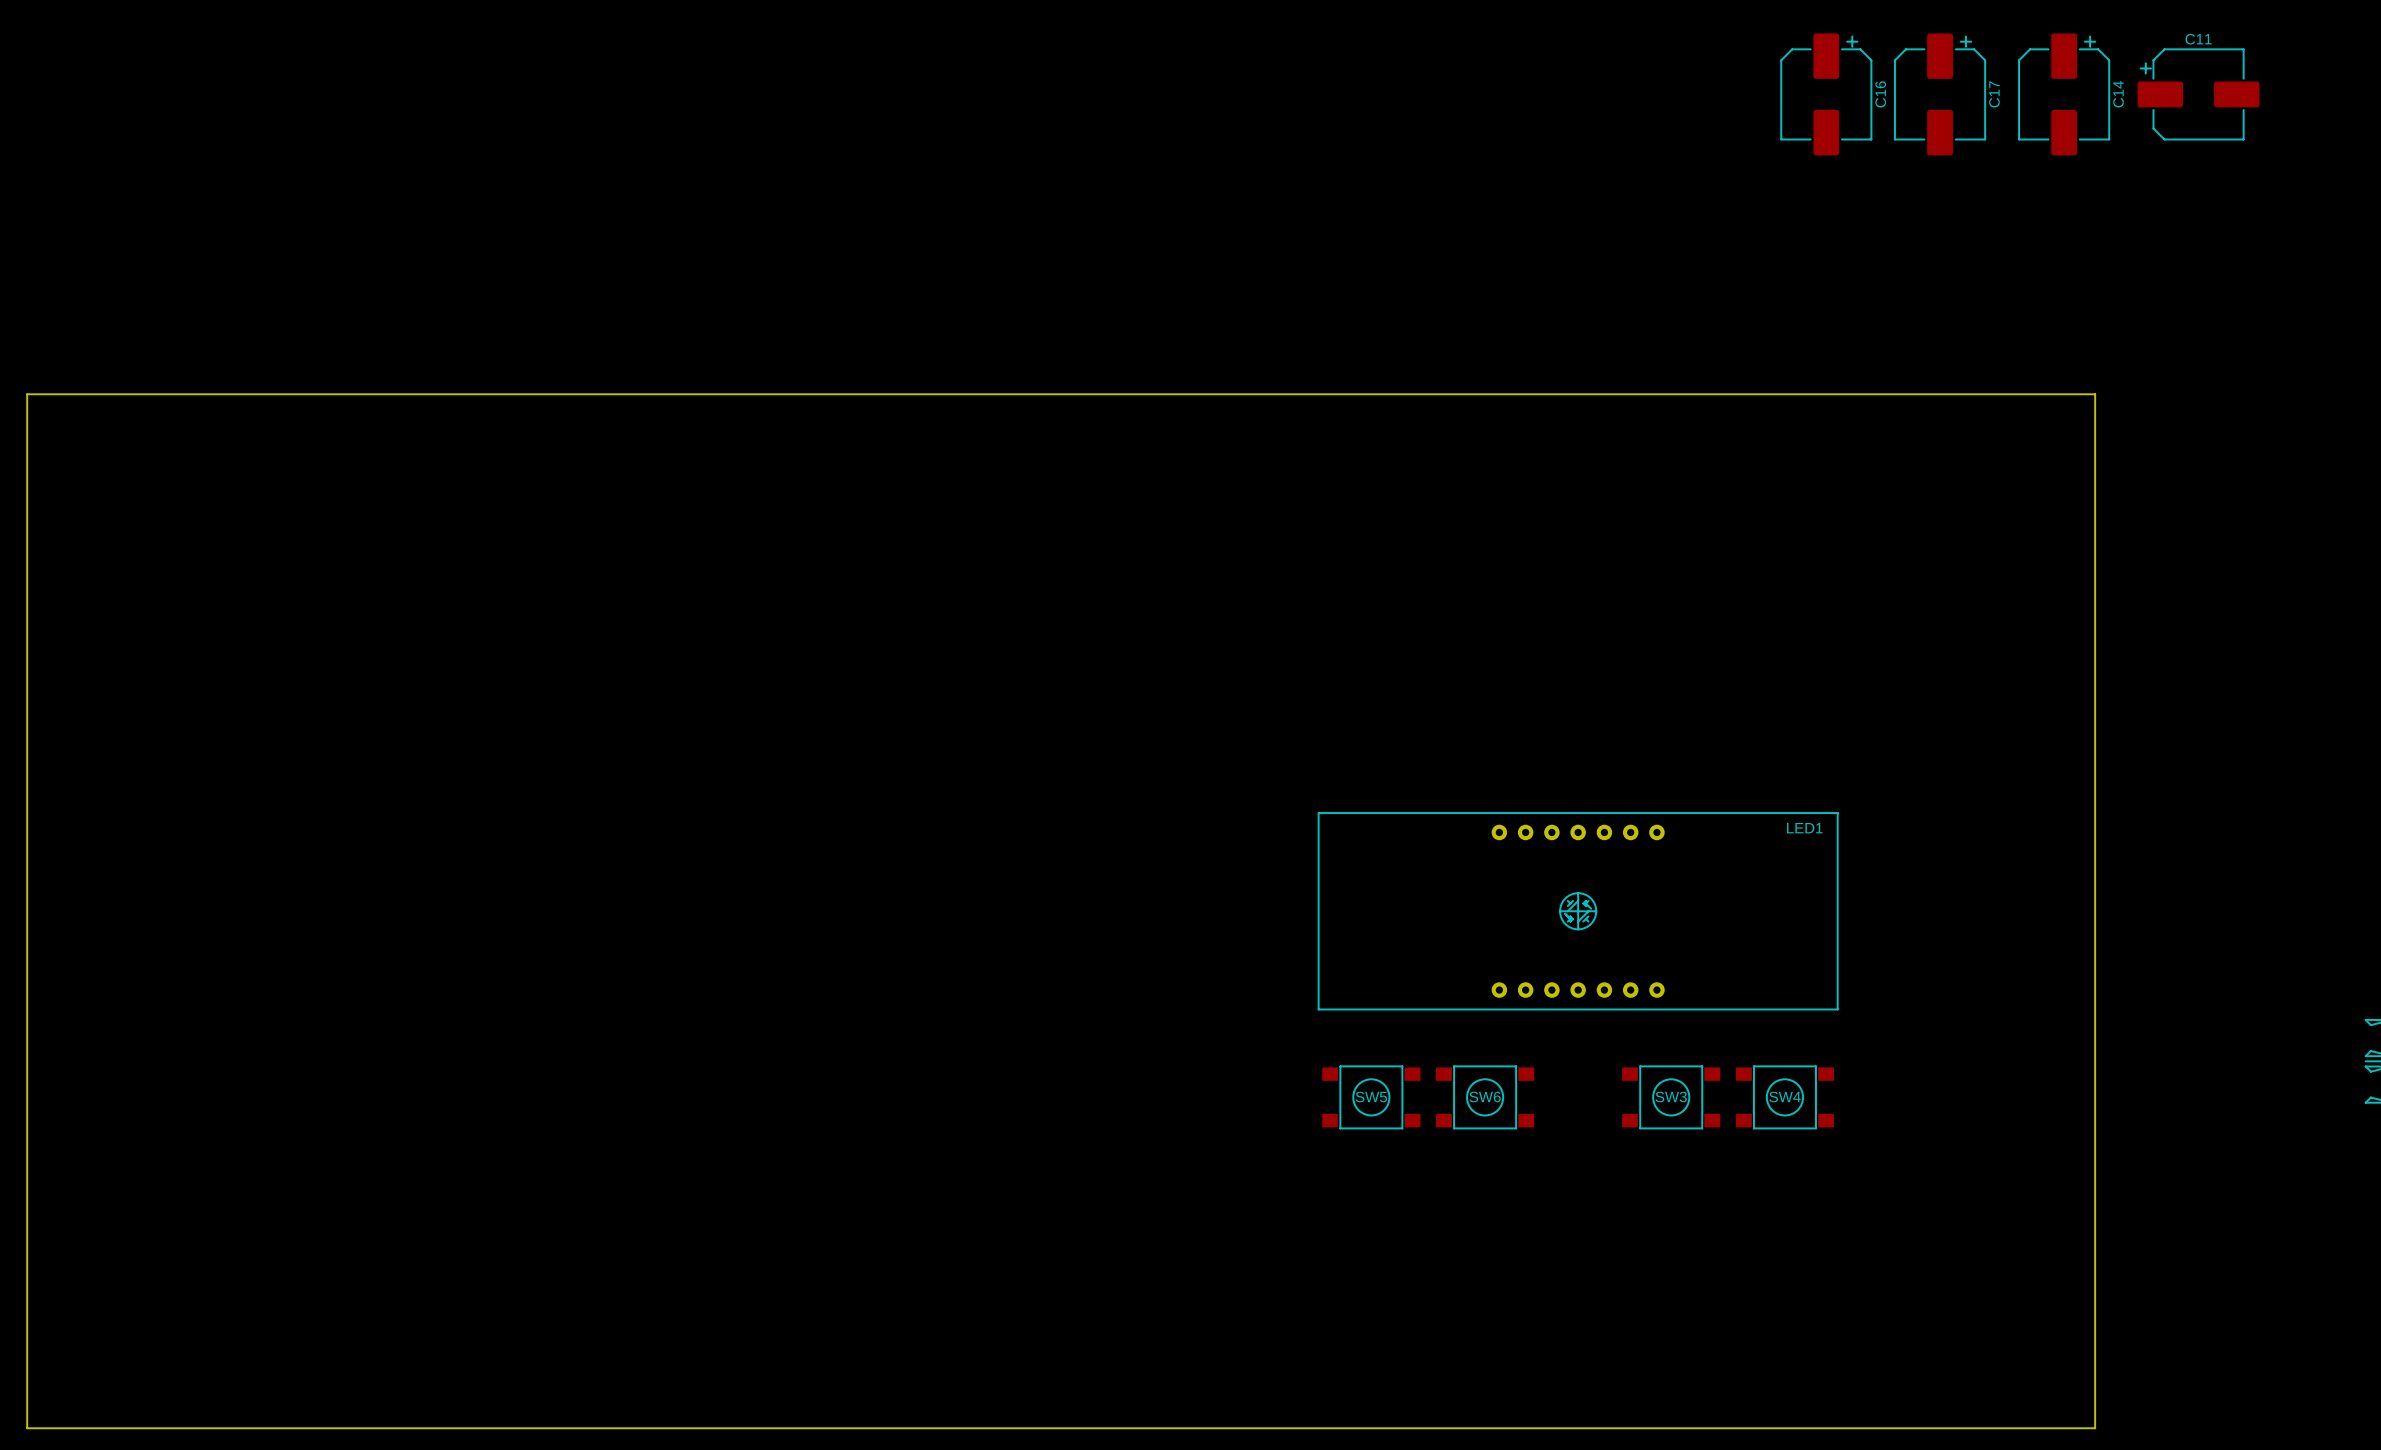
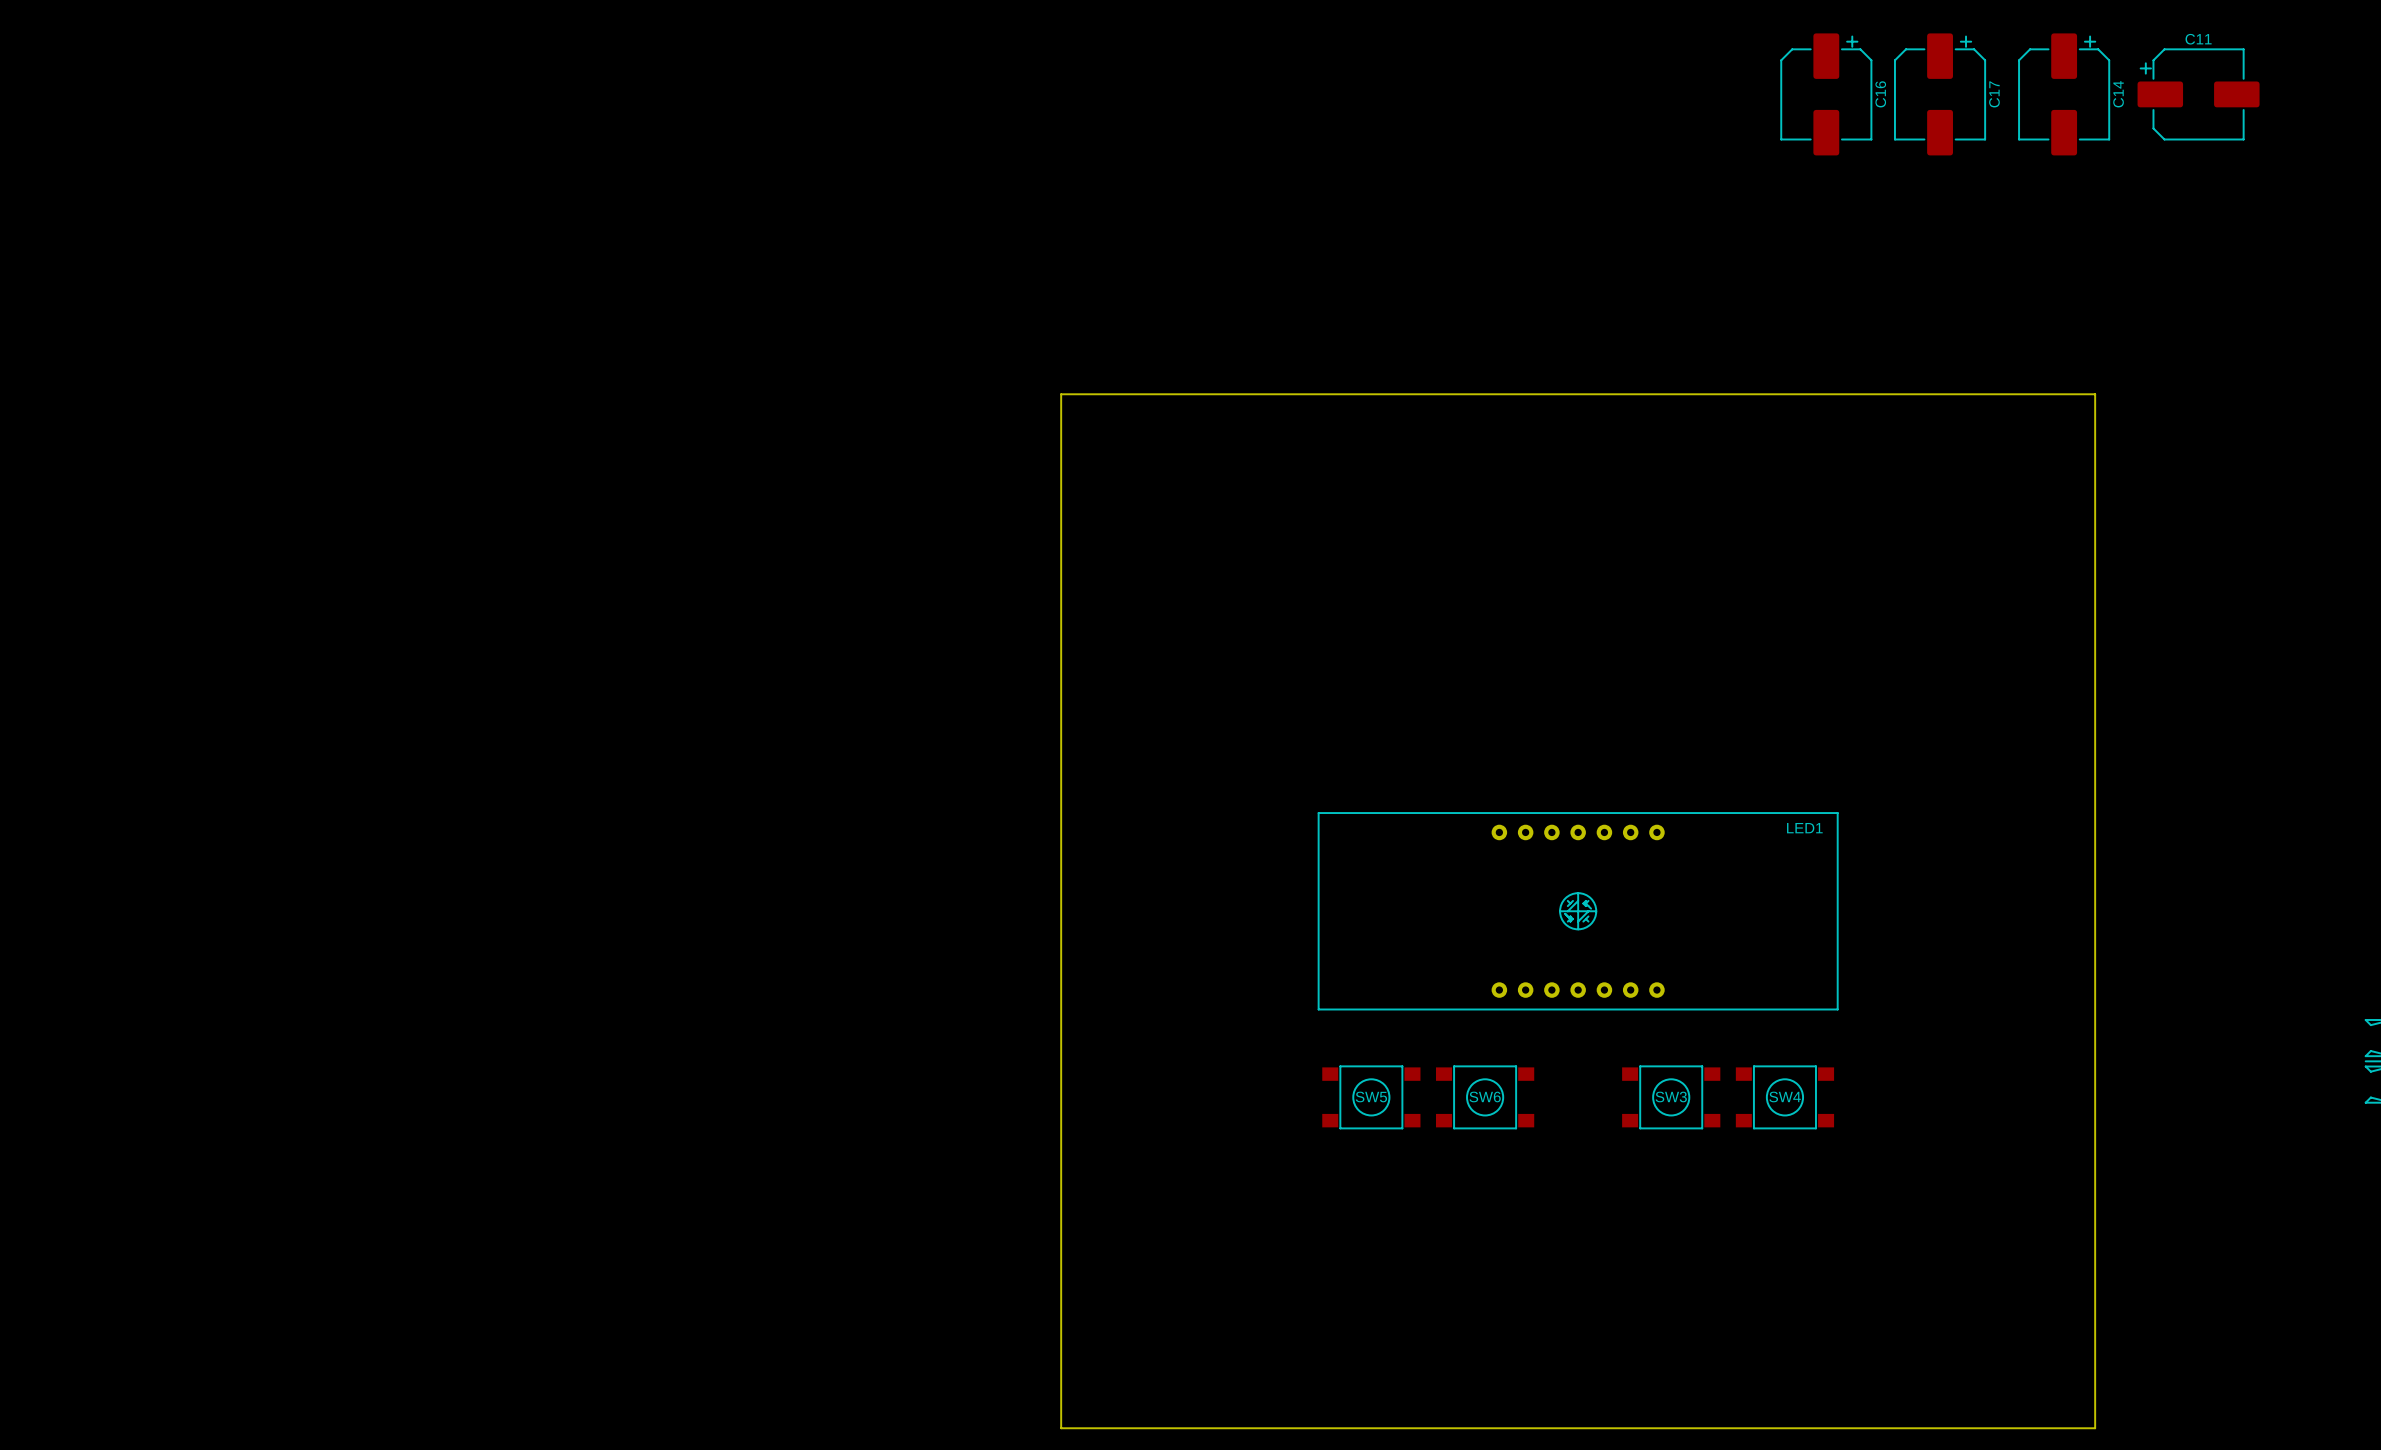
board edge: (1061, 394) (27, 394) (27, 1428) (1061, 1428) -> (1061, 394) (1061, 1428)

